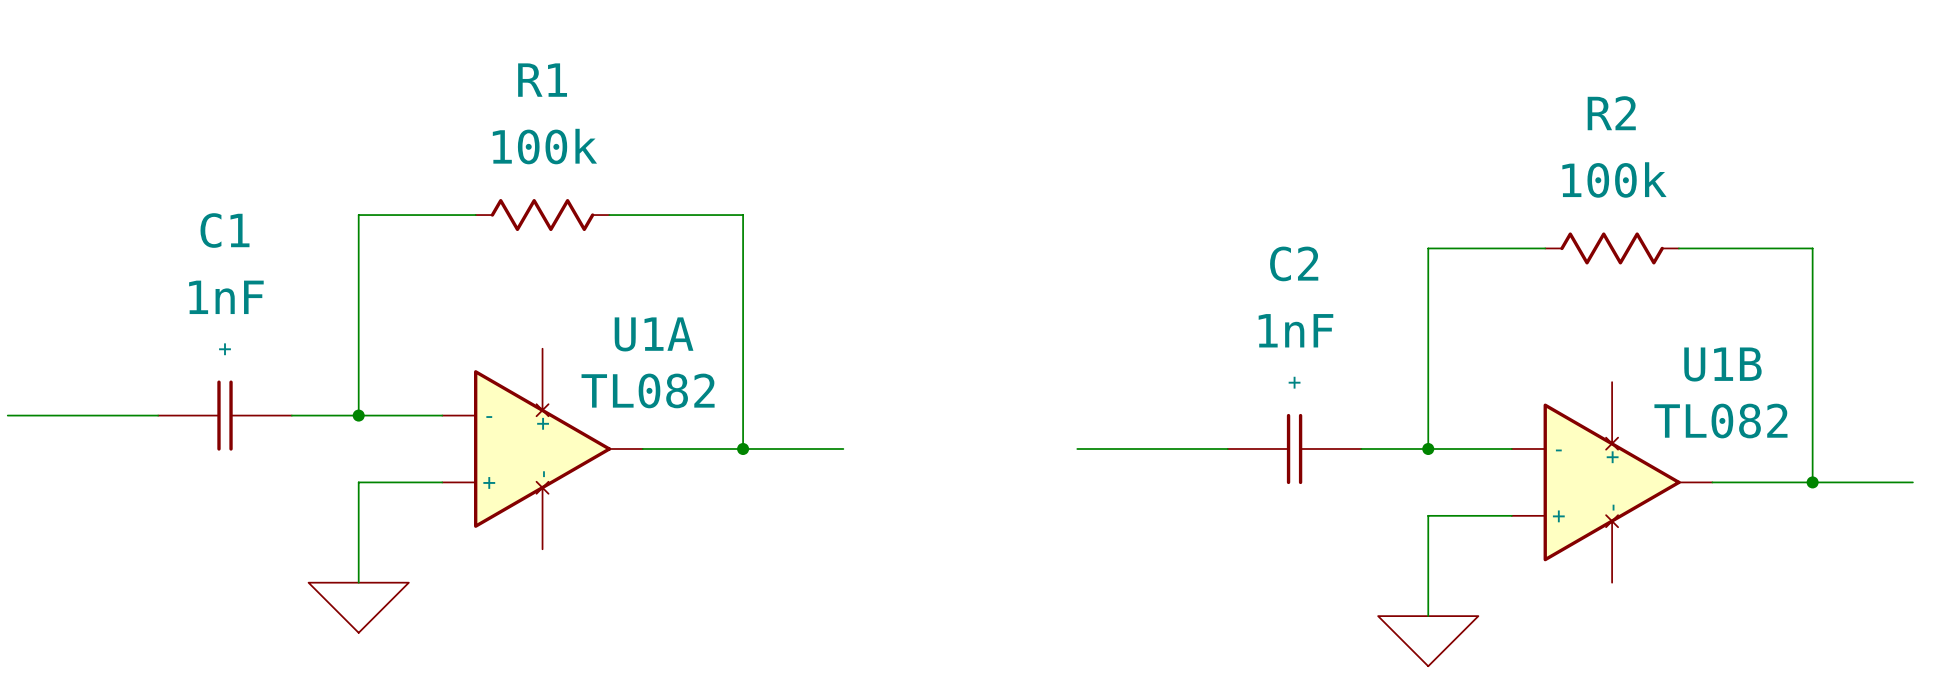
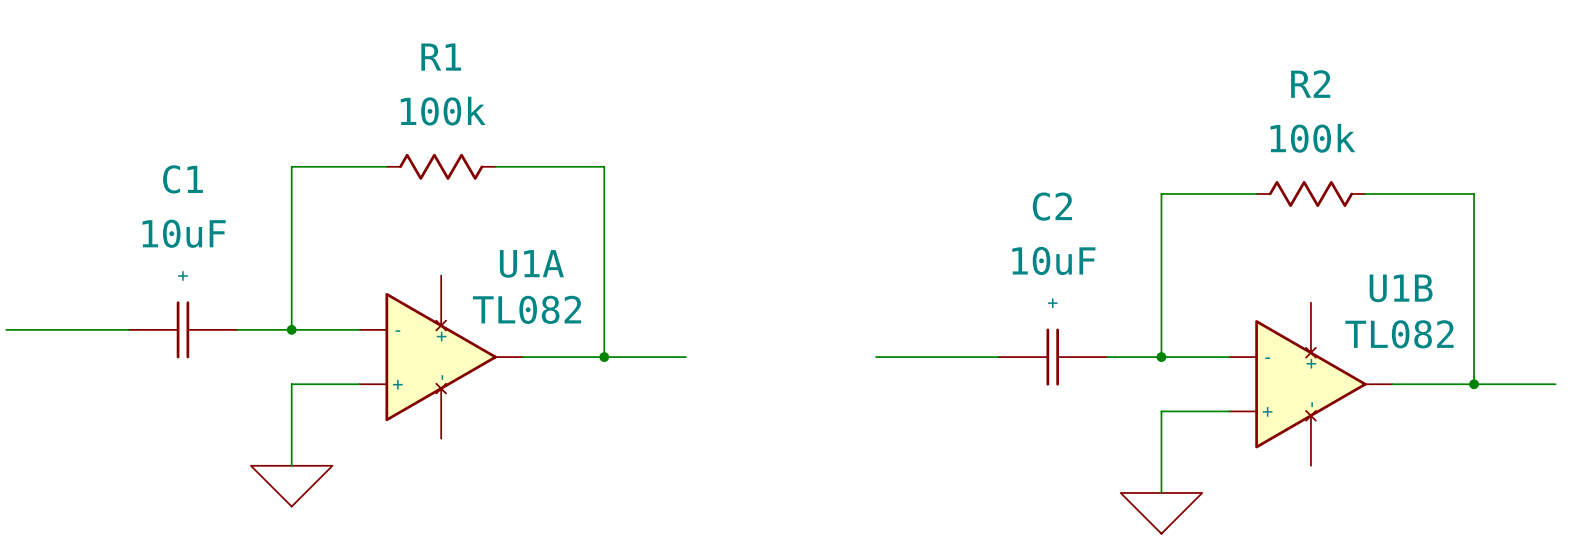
C1 value: 1nF (226, 297) -> 10uF (184, 233)
C2 value: 1nF (1295, 330) -> 10uF (1053, 260)

